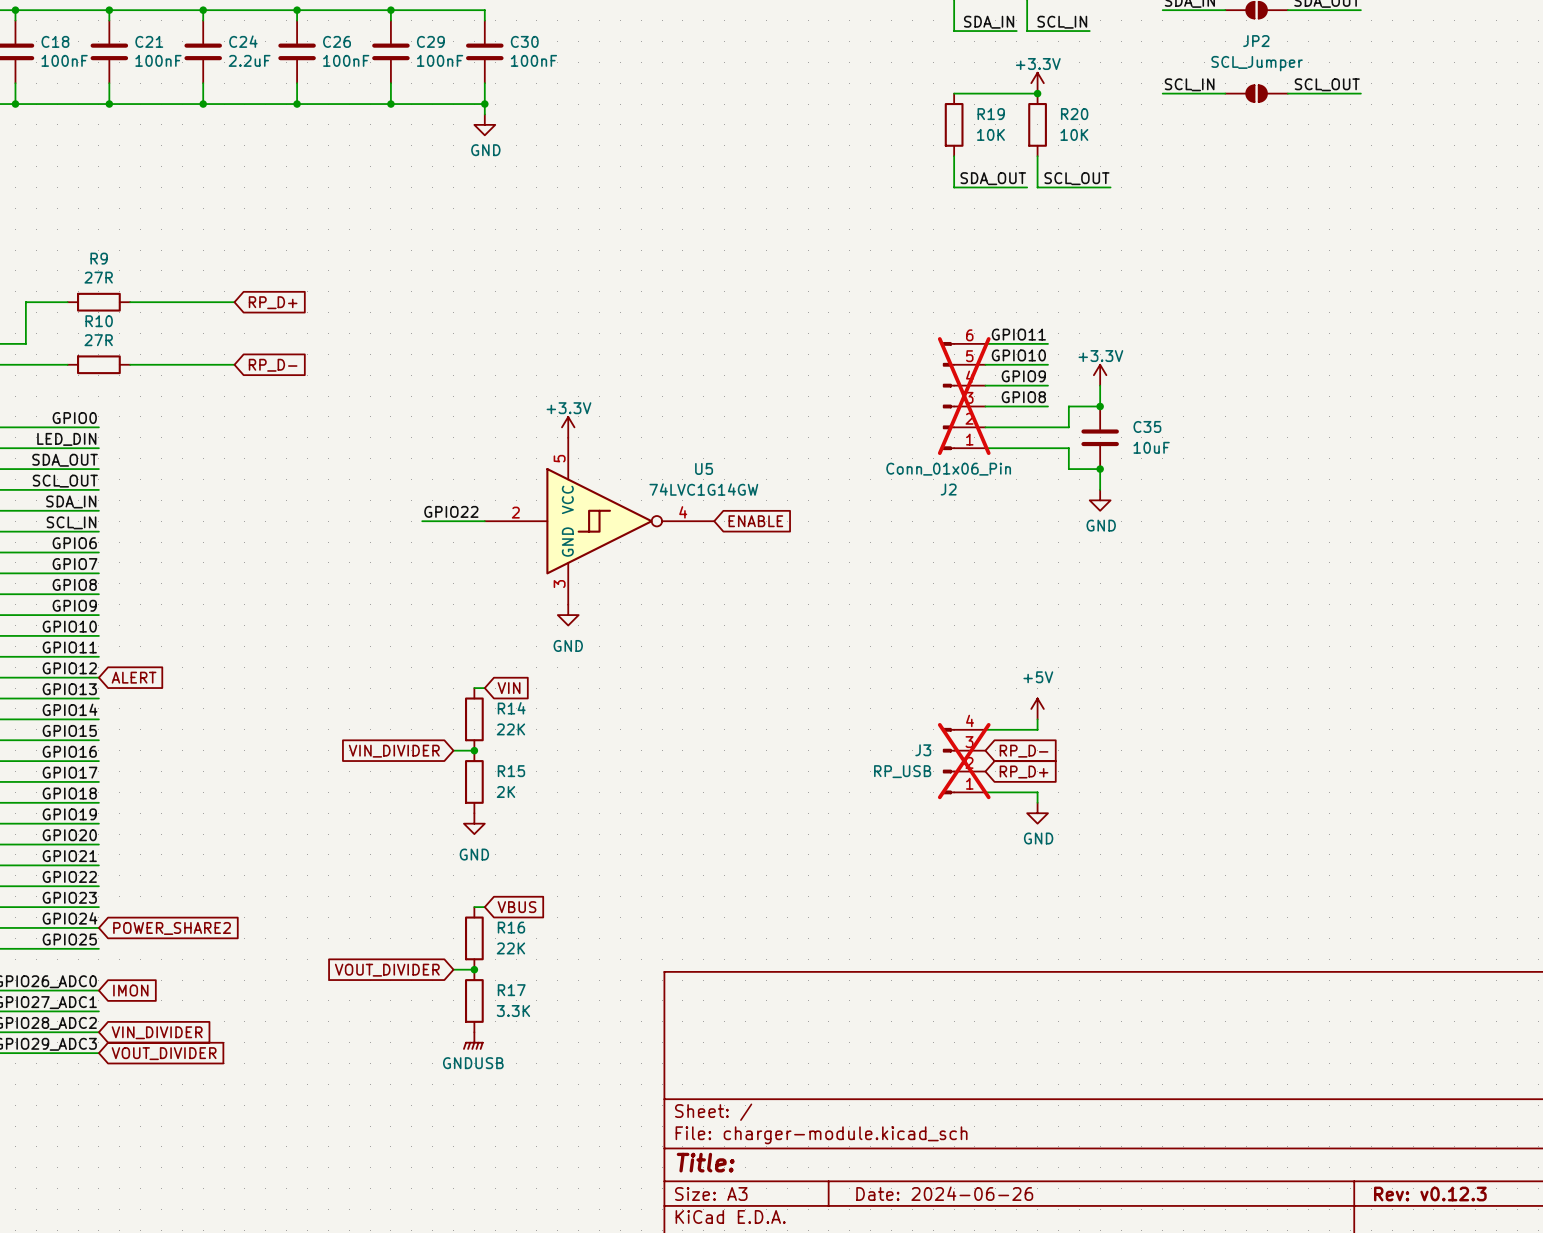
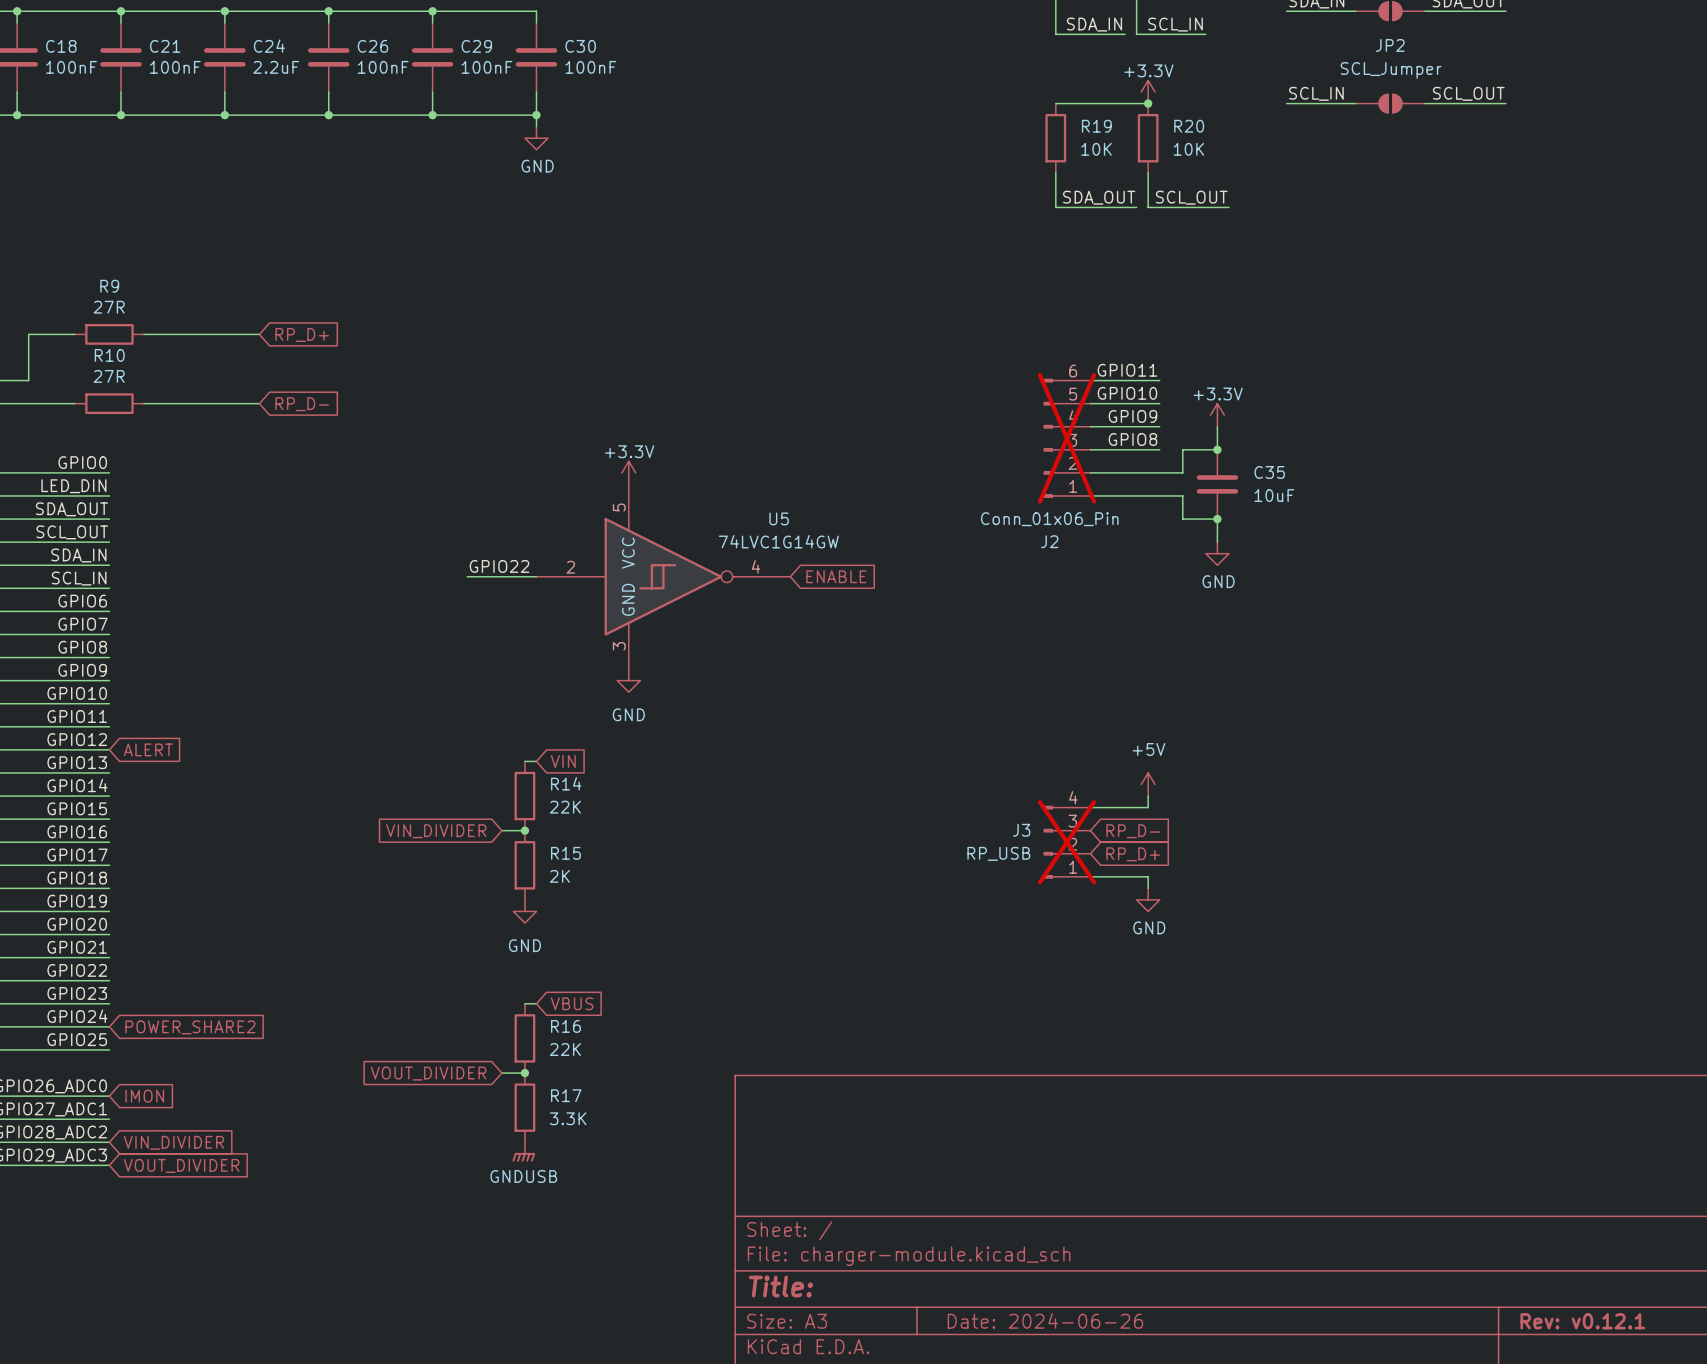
title block: Rev: v0.12.3 (1430, 1193) -> Rev: v0.12.1 (1582, 1321)

